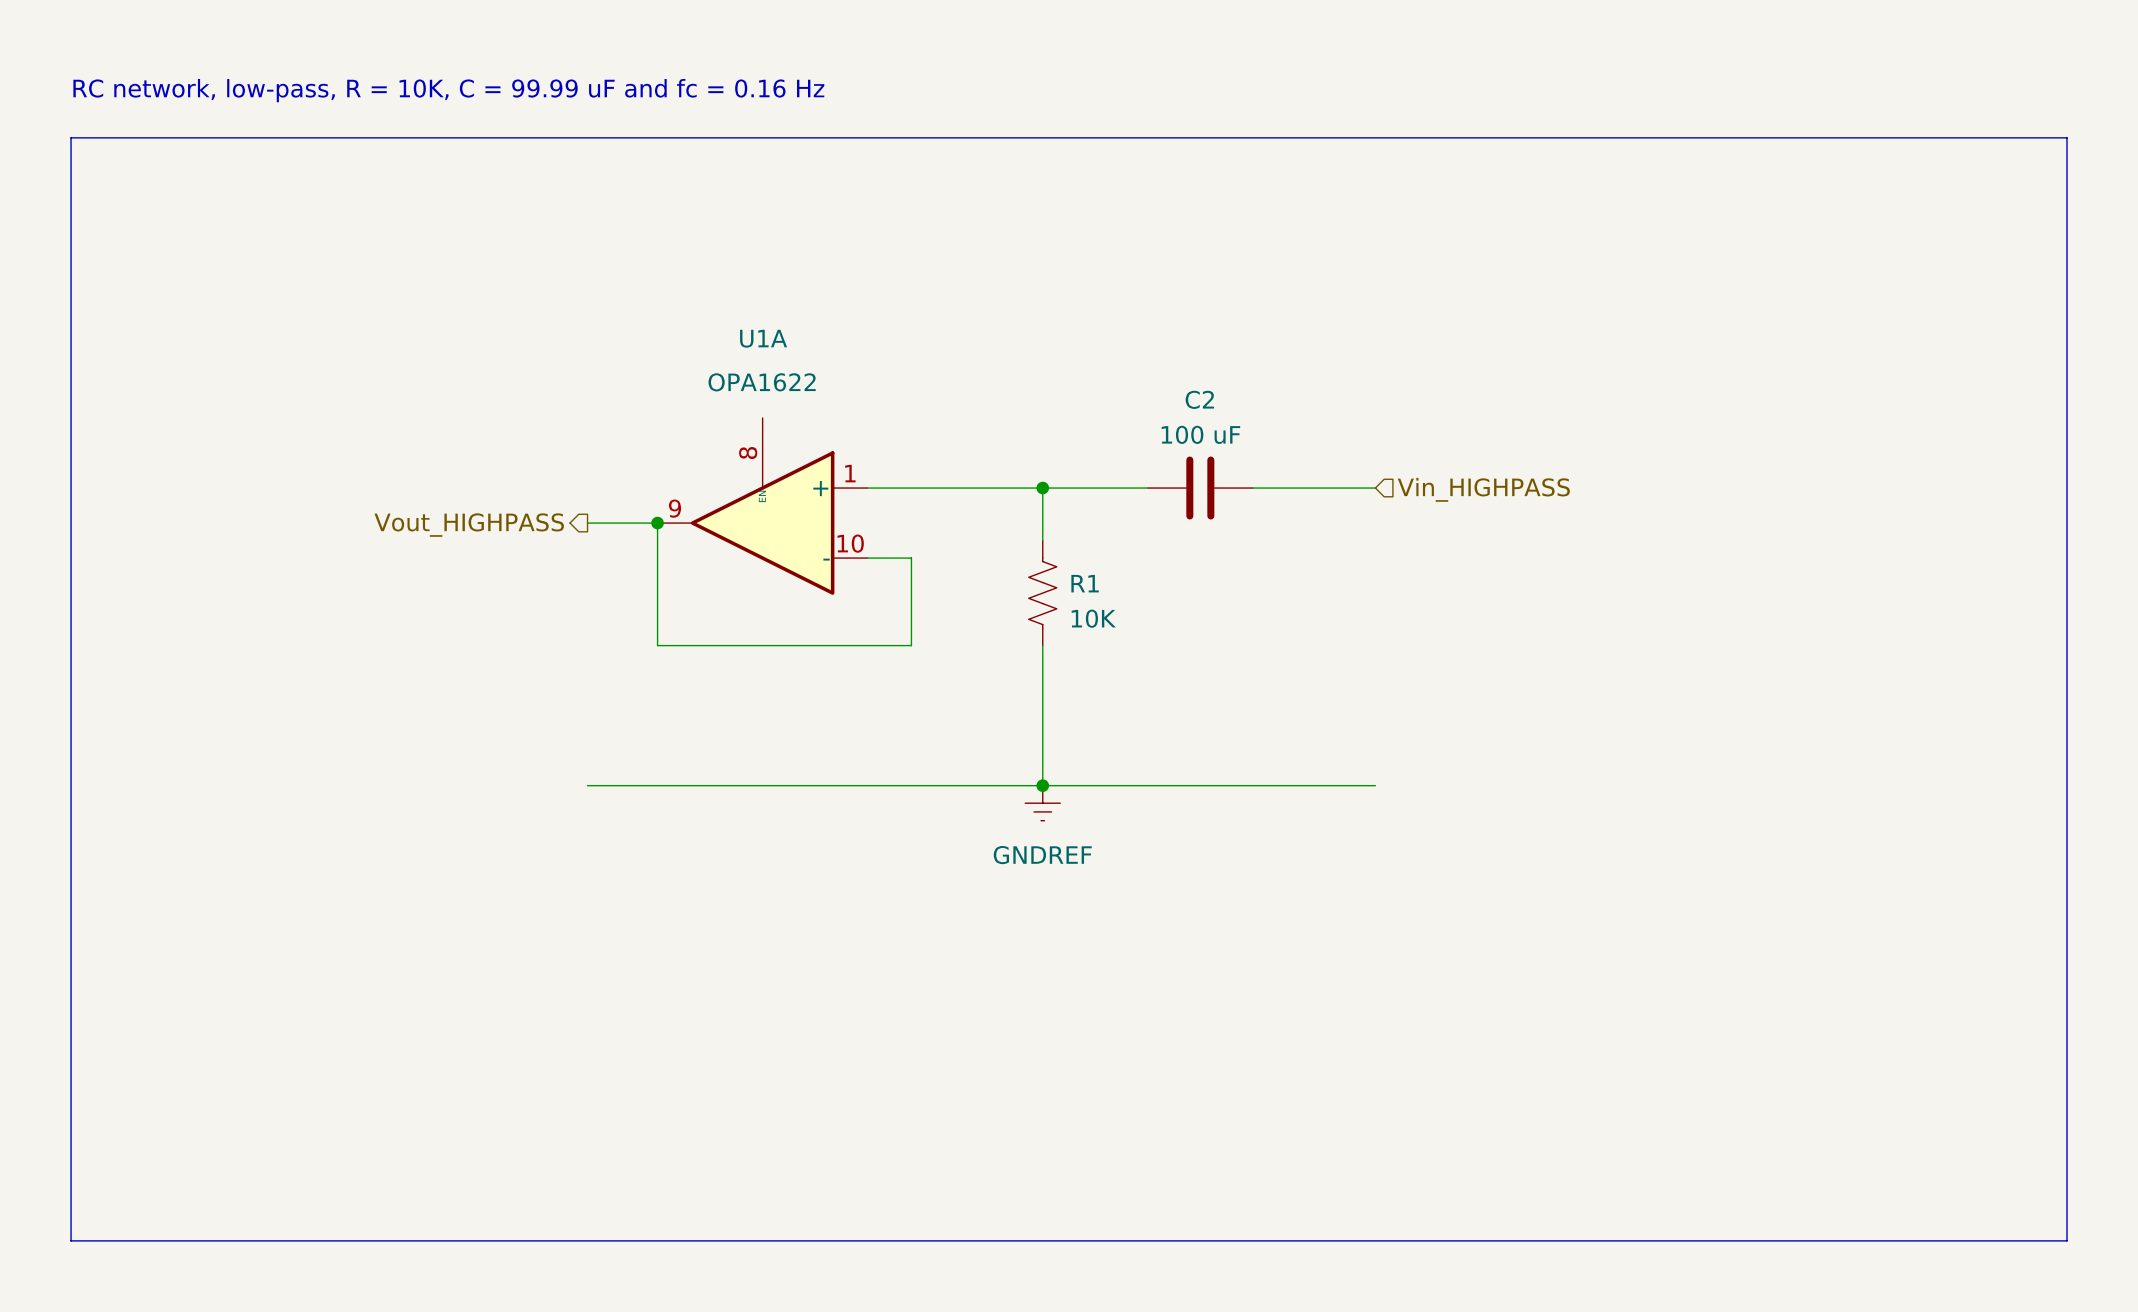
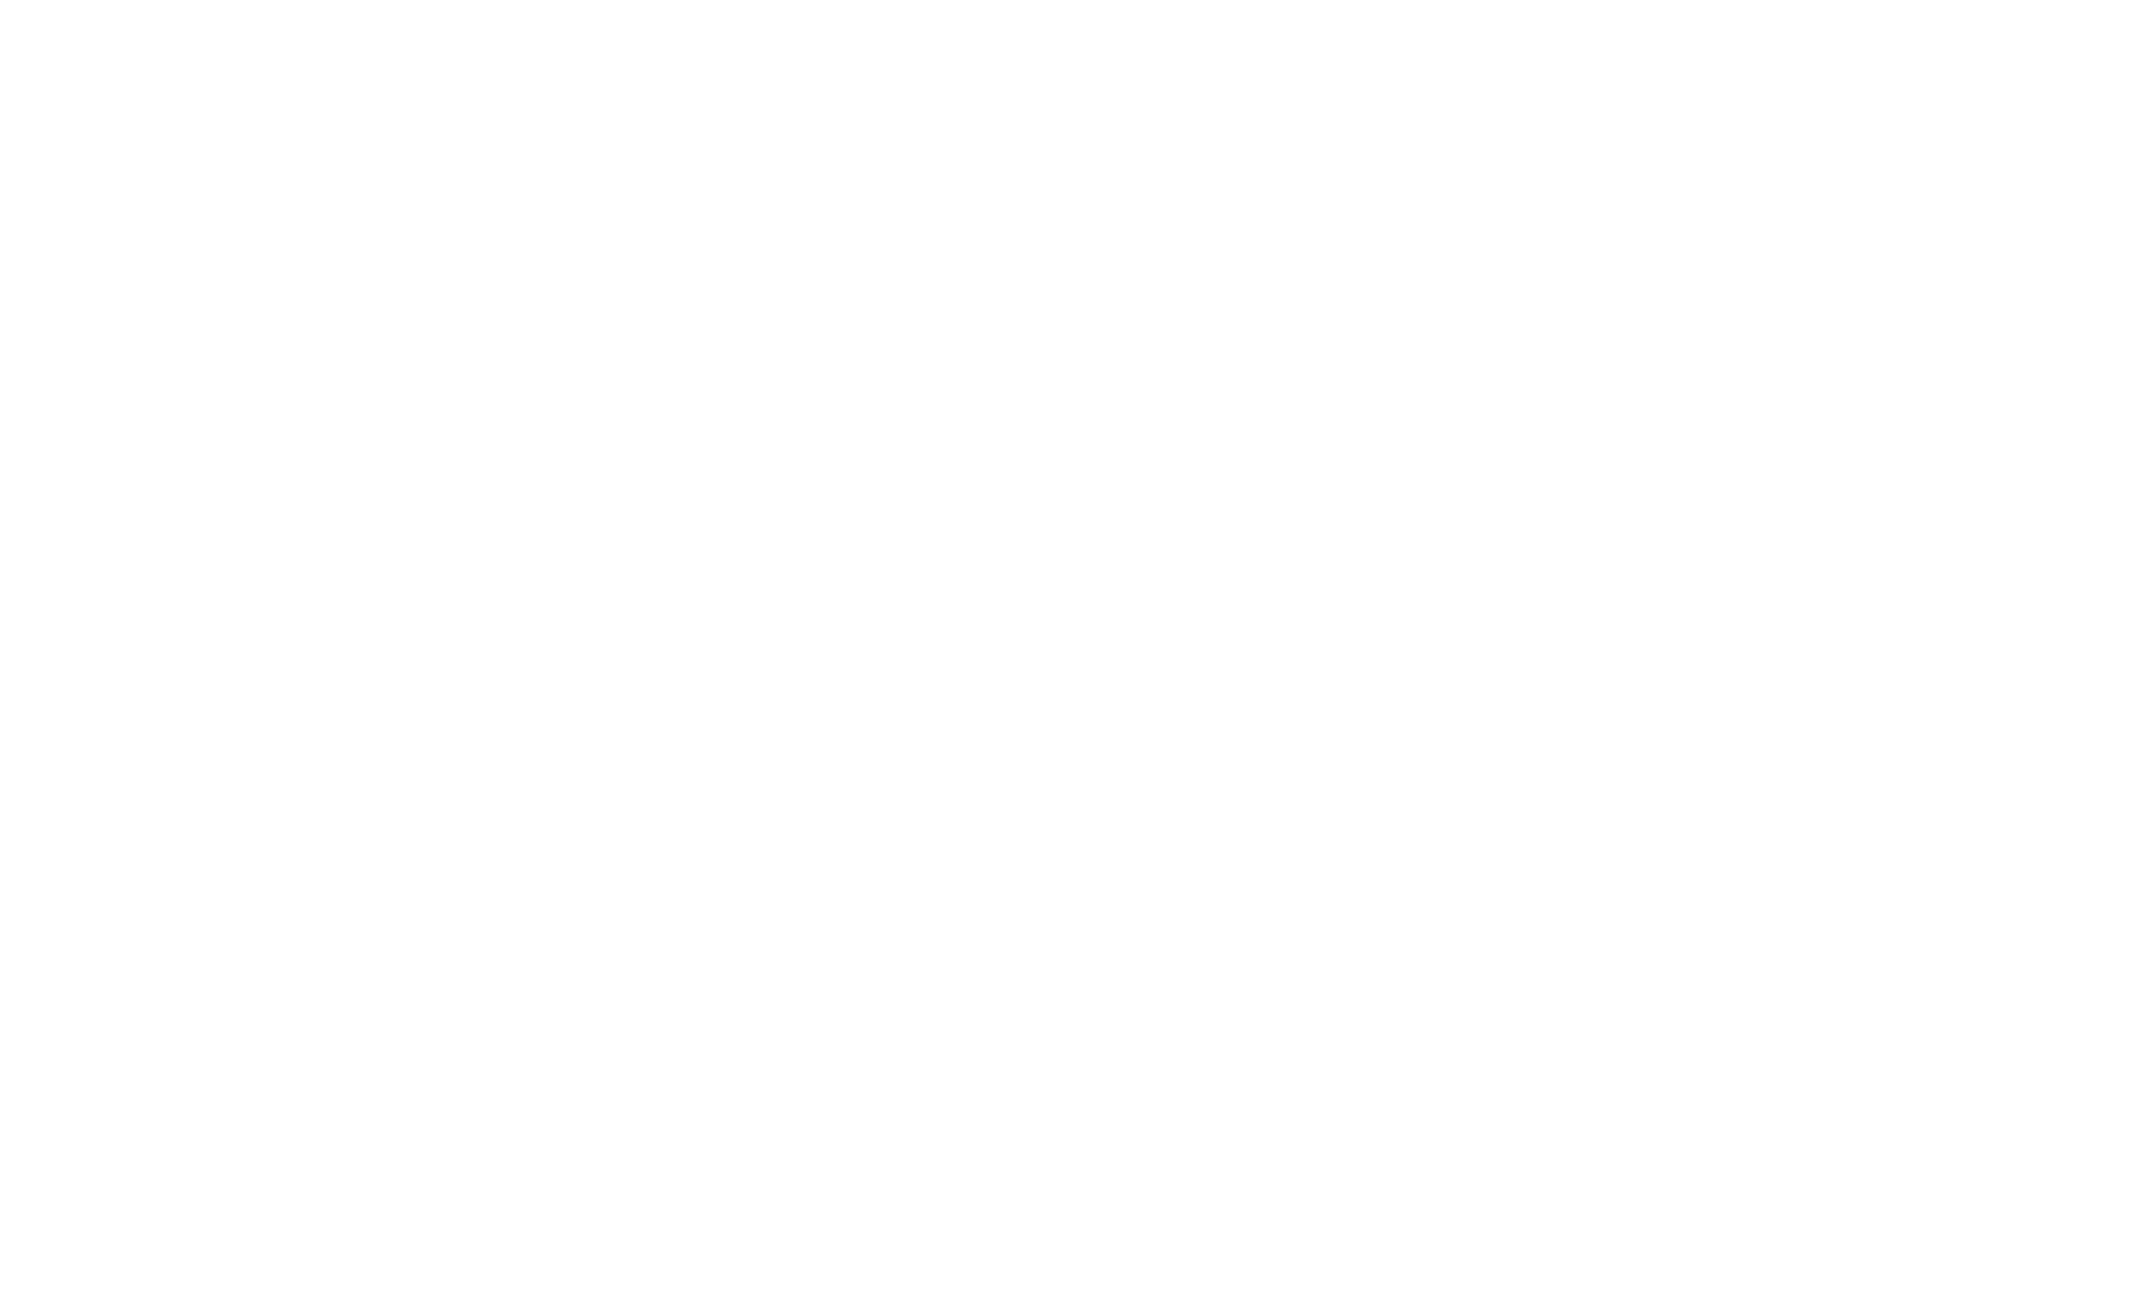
text: RC network, low-pass, R = 10K, C = 99.99 uF and fc = 0.16 Hz (448, 90) -> none
line: (71, 137) (2067, 137) (2067, 1240) (71, 1240) (71, 137) -> none
wire: (867, 488) (1147, 488) -> none
wire: (1042, 488) (1042, 540) -> none
junction: (1042, 488) -> none
C2: 100 uF (1200, 488) -> none
wire: (1252, 488) (1375, 488) -> none
hierarchical label: Vin_HIGHPASS (1483, 489) -> none
U1A: OPA1622 (762, 506) -> none
wire: (587, 523) (657, 523) (657, 645) (911, 645) (911, 558) (867, 558) -> none
junction: (657, 523) -> none
hierarchical label: Vout_HIGHPASS (469, 525) -> none
R1: 10K (1042, 593) -> none
wire: (1042, 645) (1042, 785) -> none
wire: (587, 785) (1375, 785) -> none
junction: (1042, 785) -> none
power symbol: GNDREF (1042, 803) -> none

